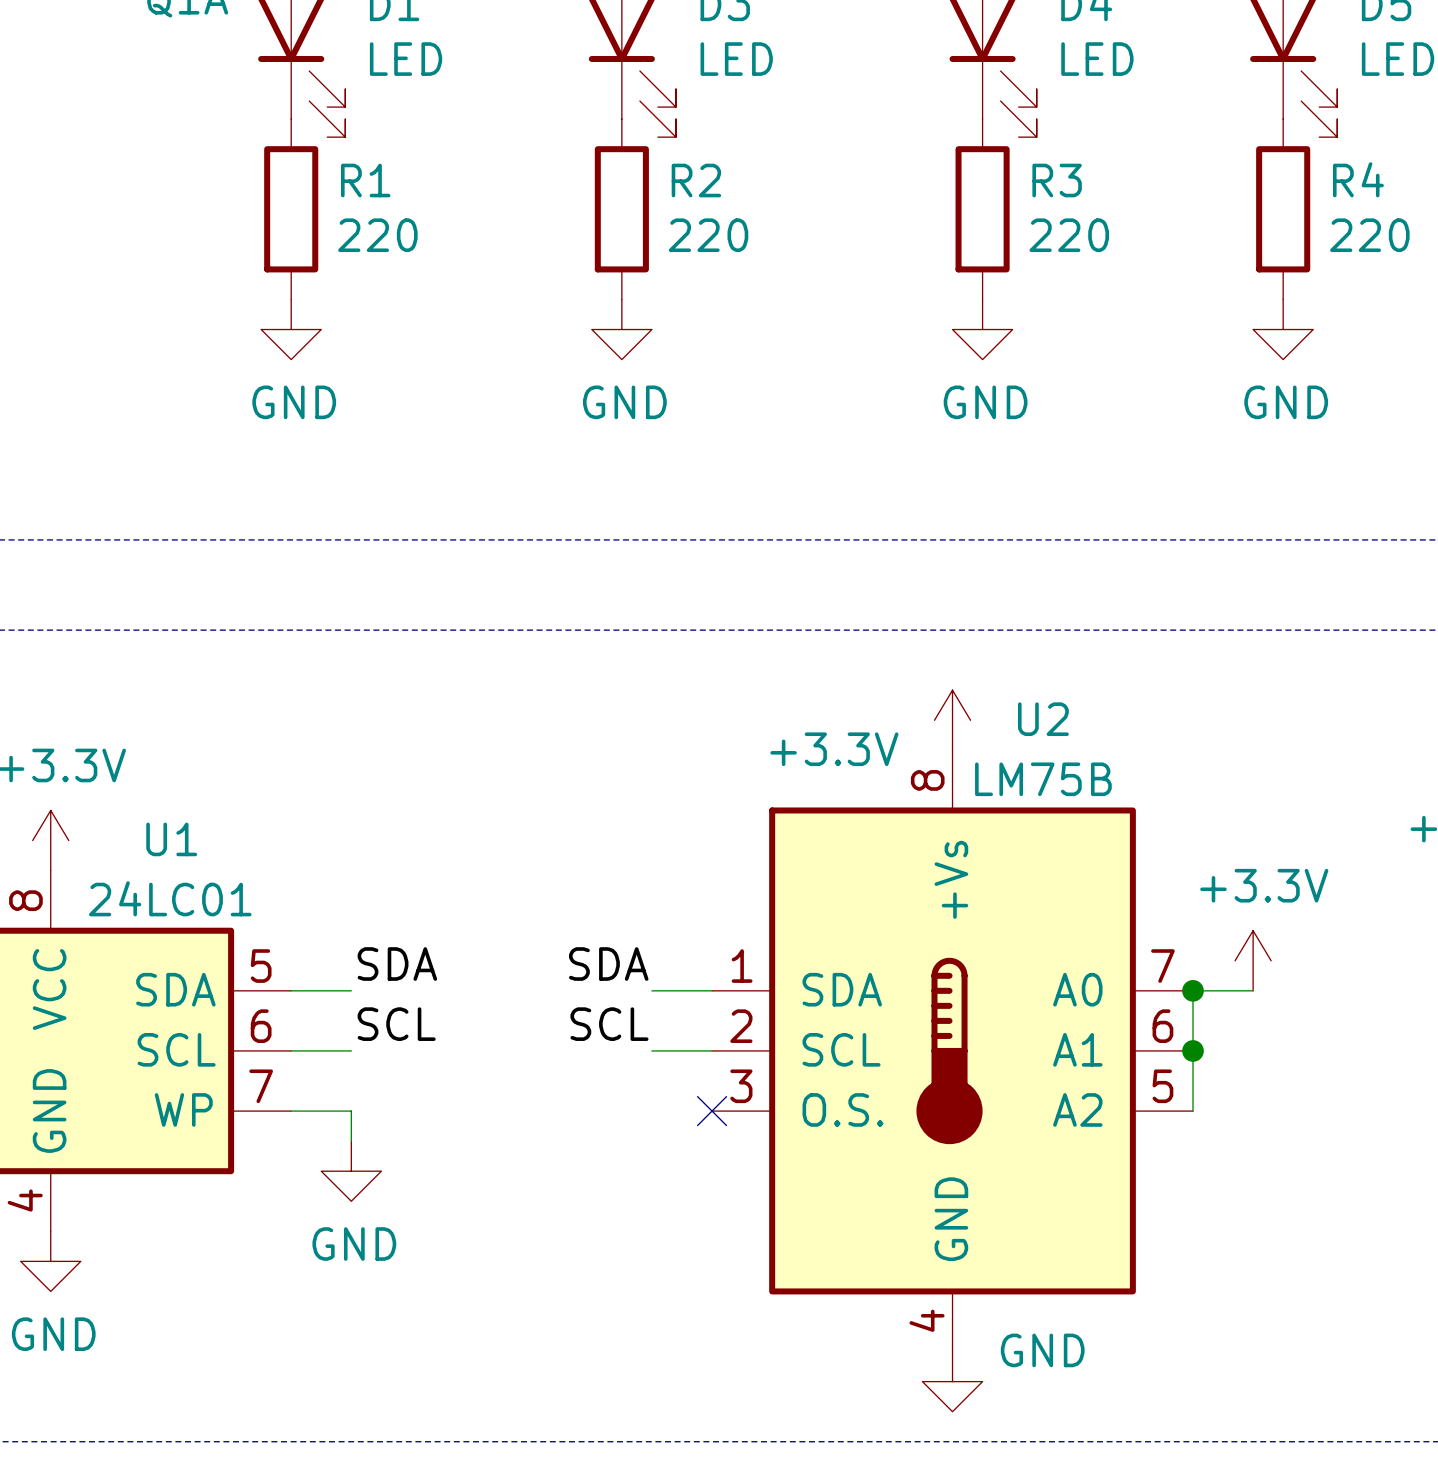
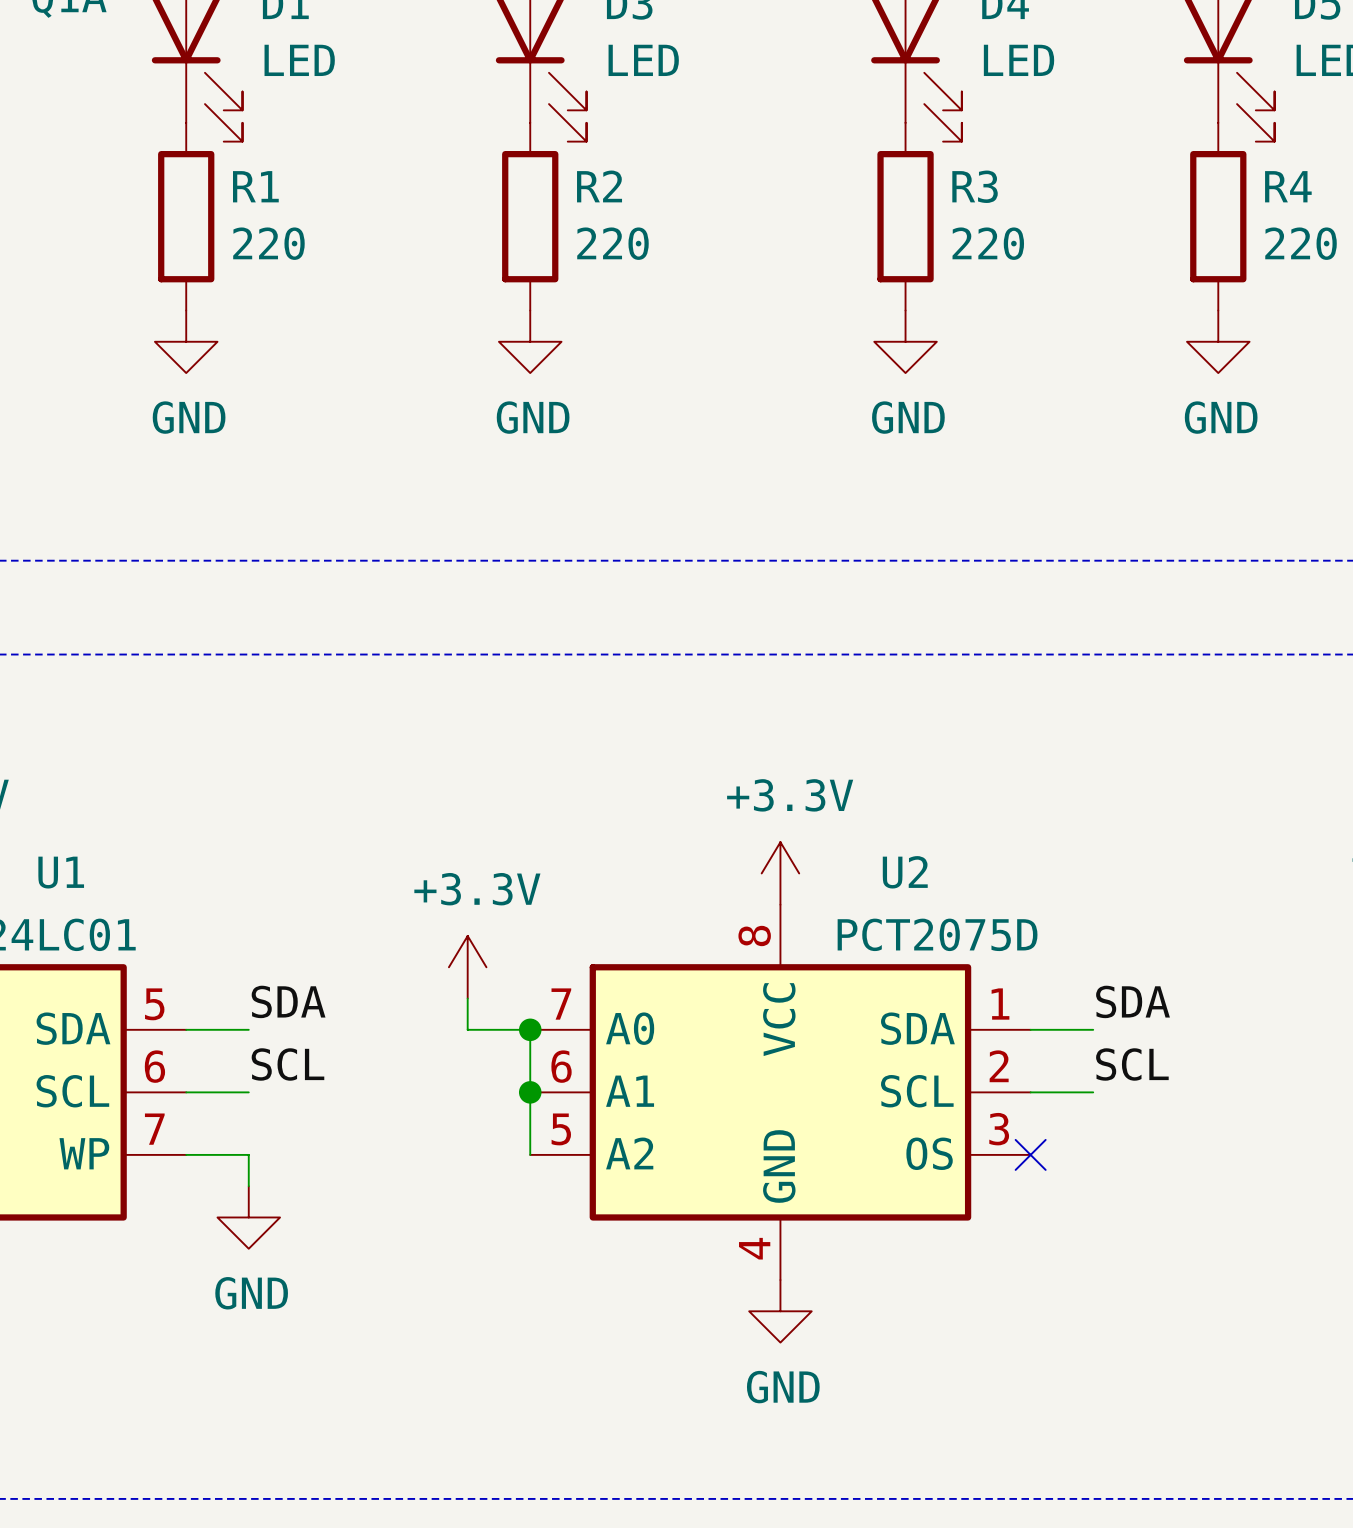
U2 name position: U2 (1043, 719) -> U2 (905, 872)
power symbol position: +3.3V (952, 720) -> +3.3V (780, 873)
power symbol text position: +3.3V (834, 749) -> +3.3V (790, 795)
U2 symbol: [712, 750, 1194, 1352] -> [530, 904, 1031, 1281]
U2 value: LM75B (1043, 779) -> PCT2075D (937, 934)
power symbol: none -> +3.3V (467, 967)
wire: none -> (467, 998) (467, 1029) (530, 1029) (530, 1154)
power symbol: +3.3V (1253, 960) -> none
label position: SDA (608, 964) -> SDA (1133, 1001)
junction: none -> (530, 1029)
junction: (1193, 990) -> none
wire: (1253, 990) (1193, 990) (1193, 1111) -> none
label position: SCL (609, 1024) -> SCL (1132, 1064)
junction: none -> (530, 1092)
junction: (1193, 1050) -> none
no-connect mark: (712, 1111) -> none
no-connect mark: none -> (1030, 1154)
power symbol text position: GND (1042, 1350) -> GND (783, 1387)
power symbol position: GND (952, 1381) -> GND (780, 1311)

